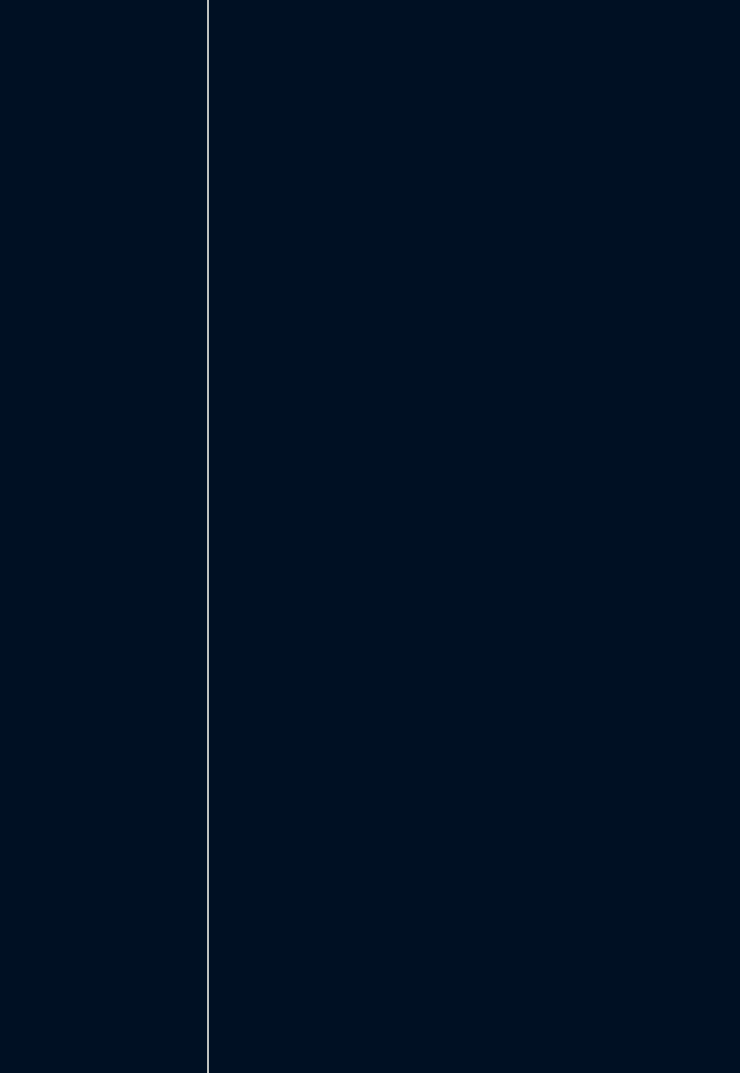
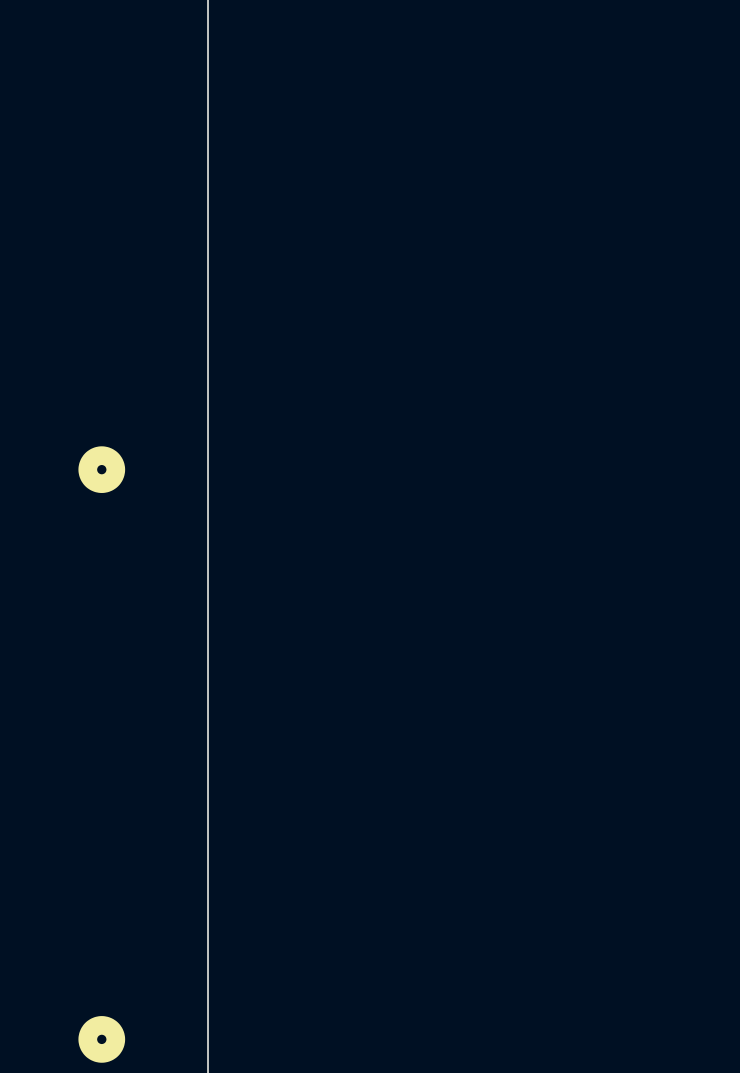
part: none -> (101, 469)
part: none -> (101, 1039)

